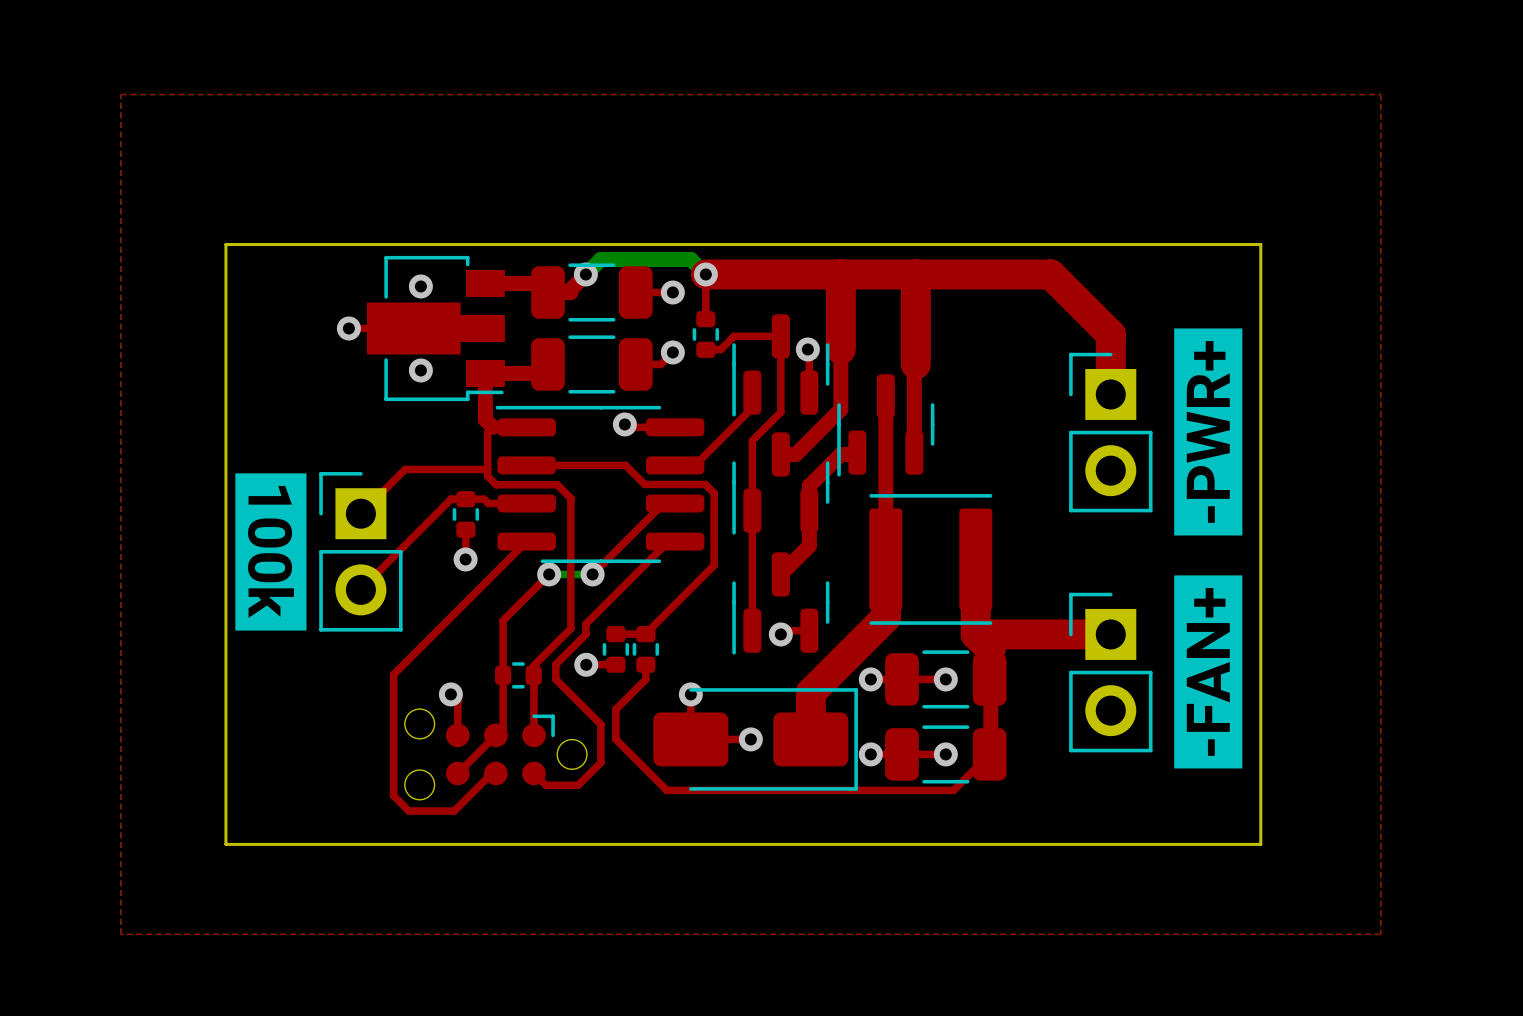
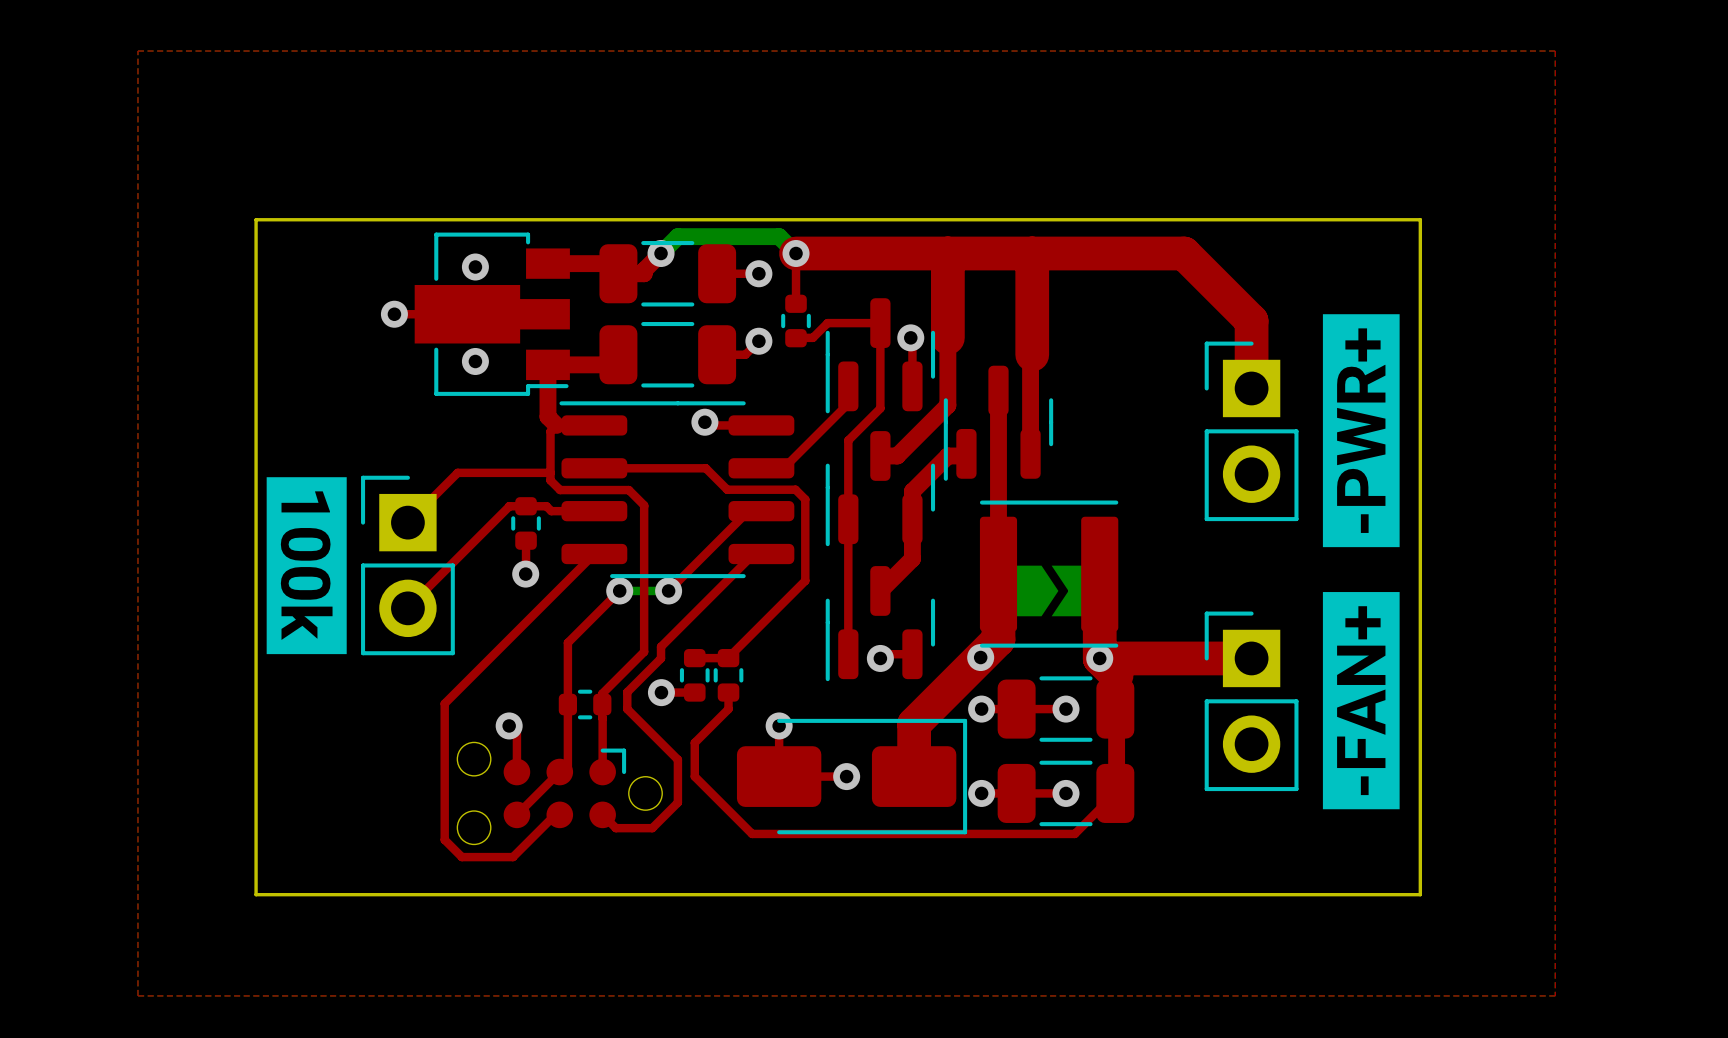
part: none -> (1049, 590)
via: none -> (980, 657)
via: none -> (1099, 658)

